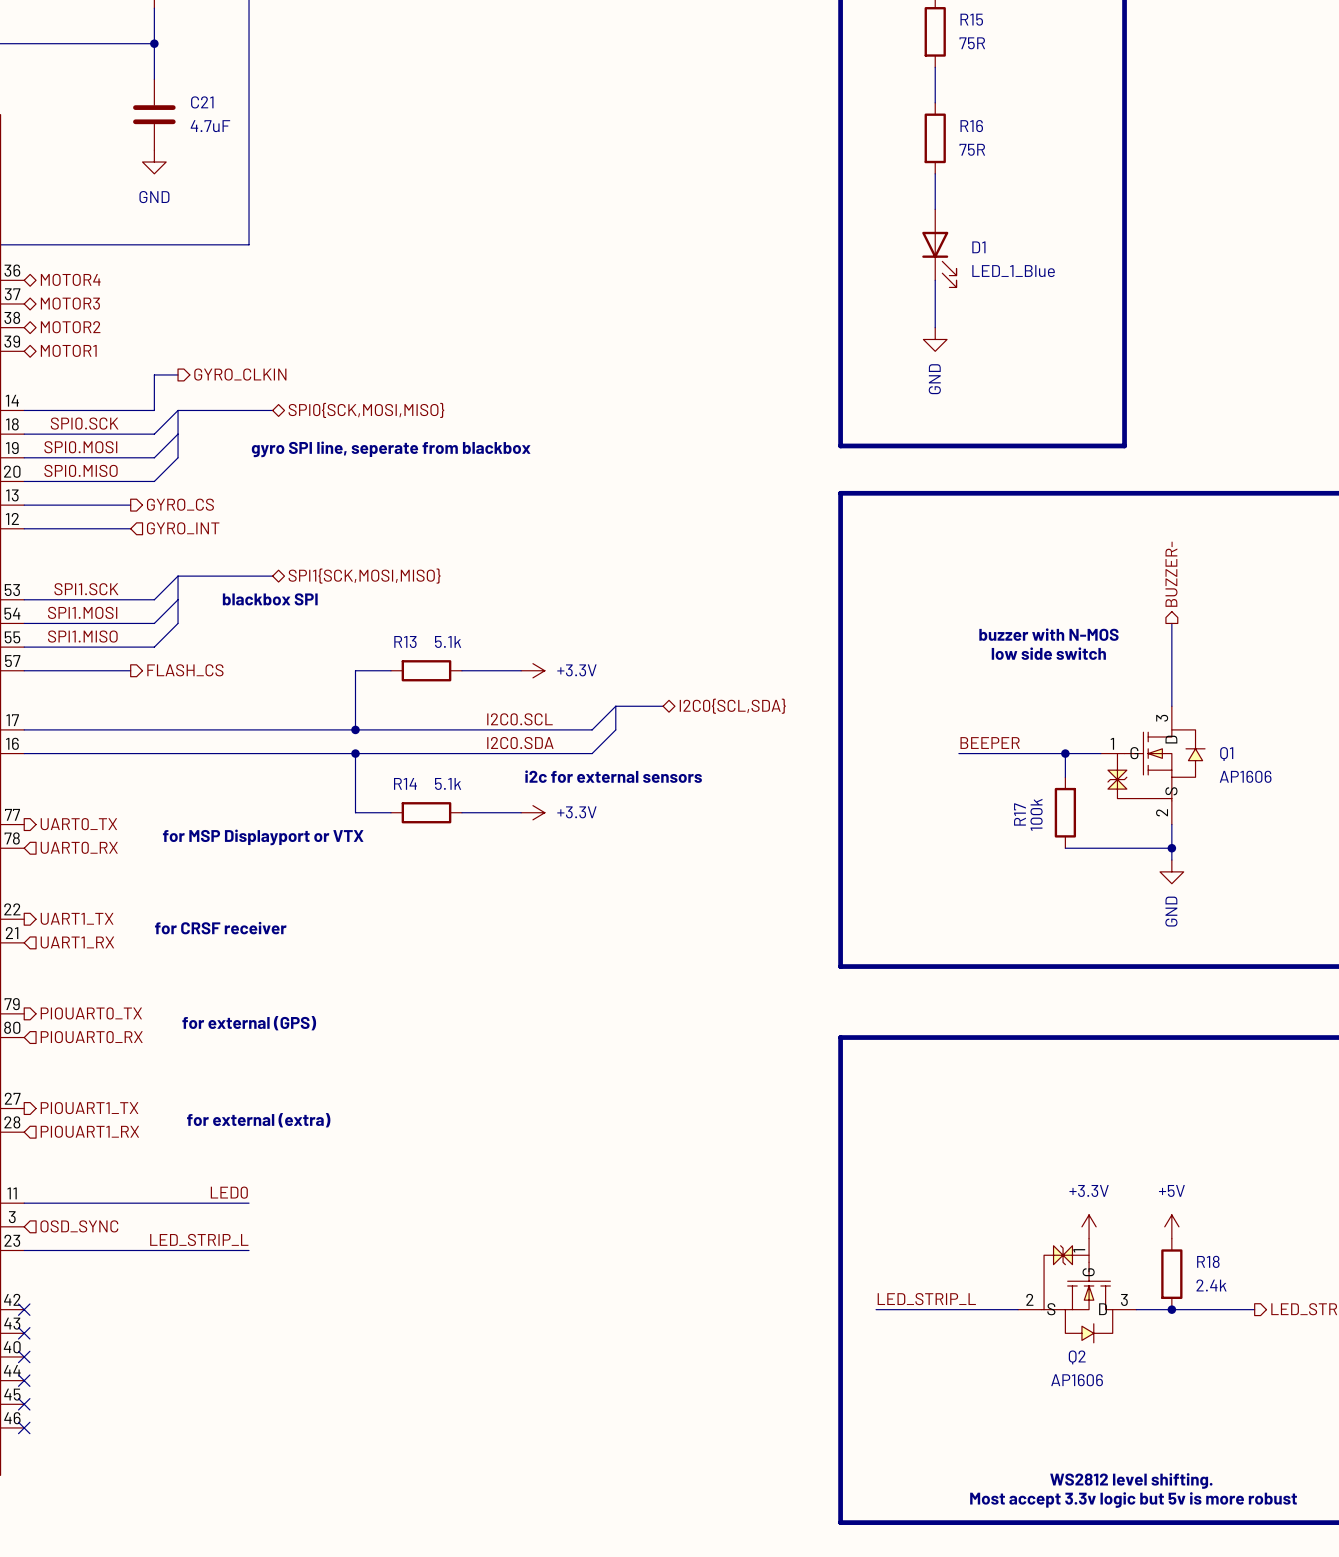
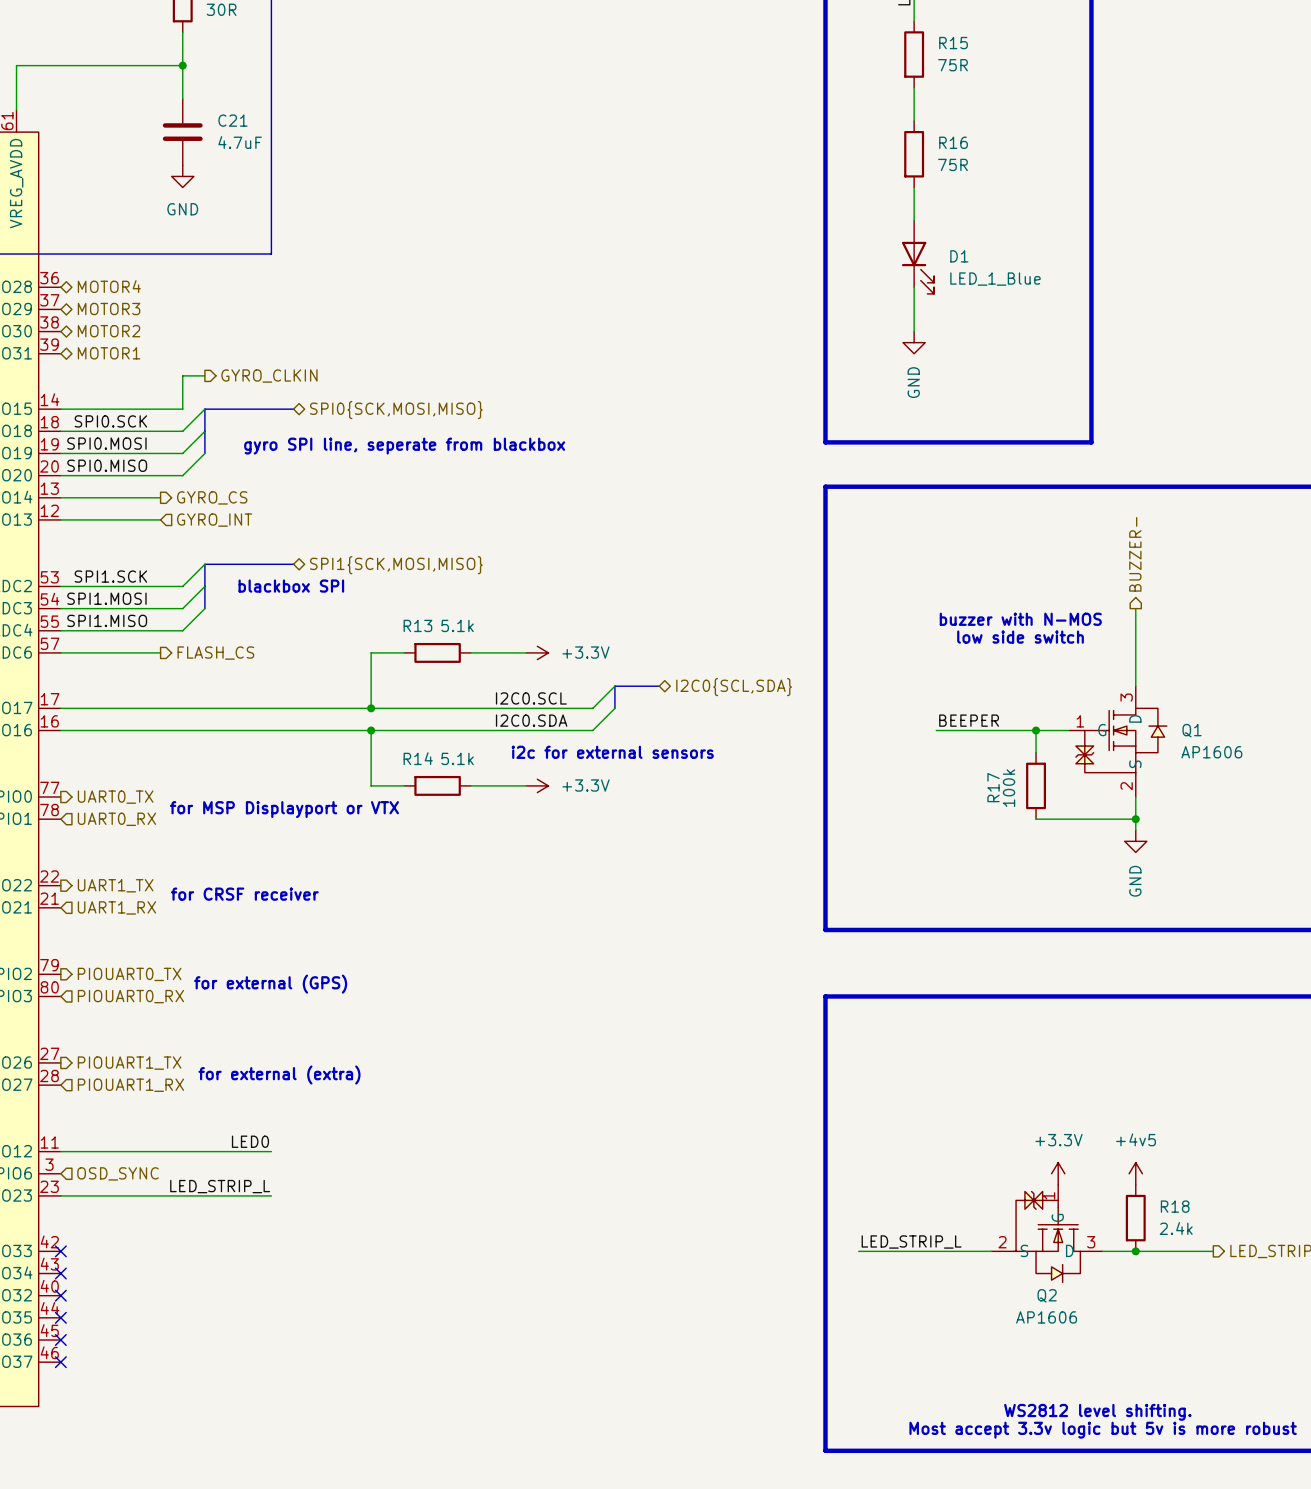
power symbol: +5V (1171, 1226) -> +4v5 (1135, 1173)

